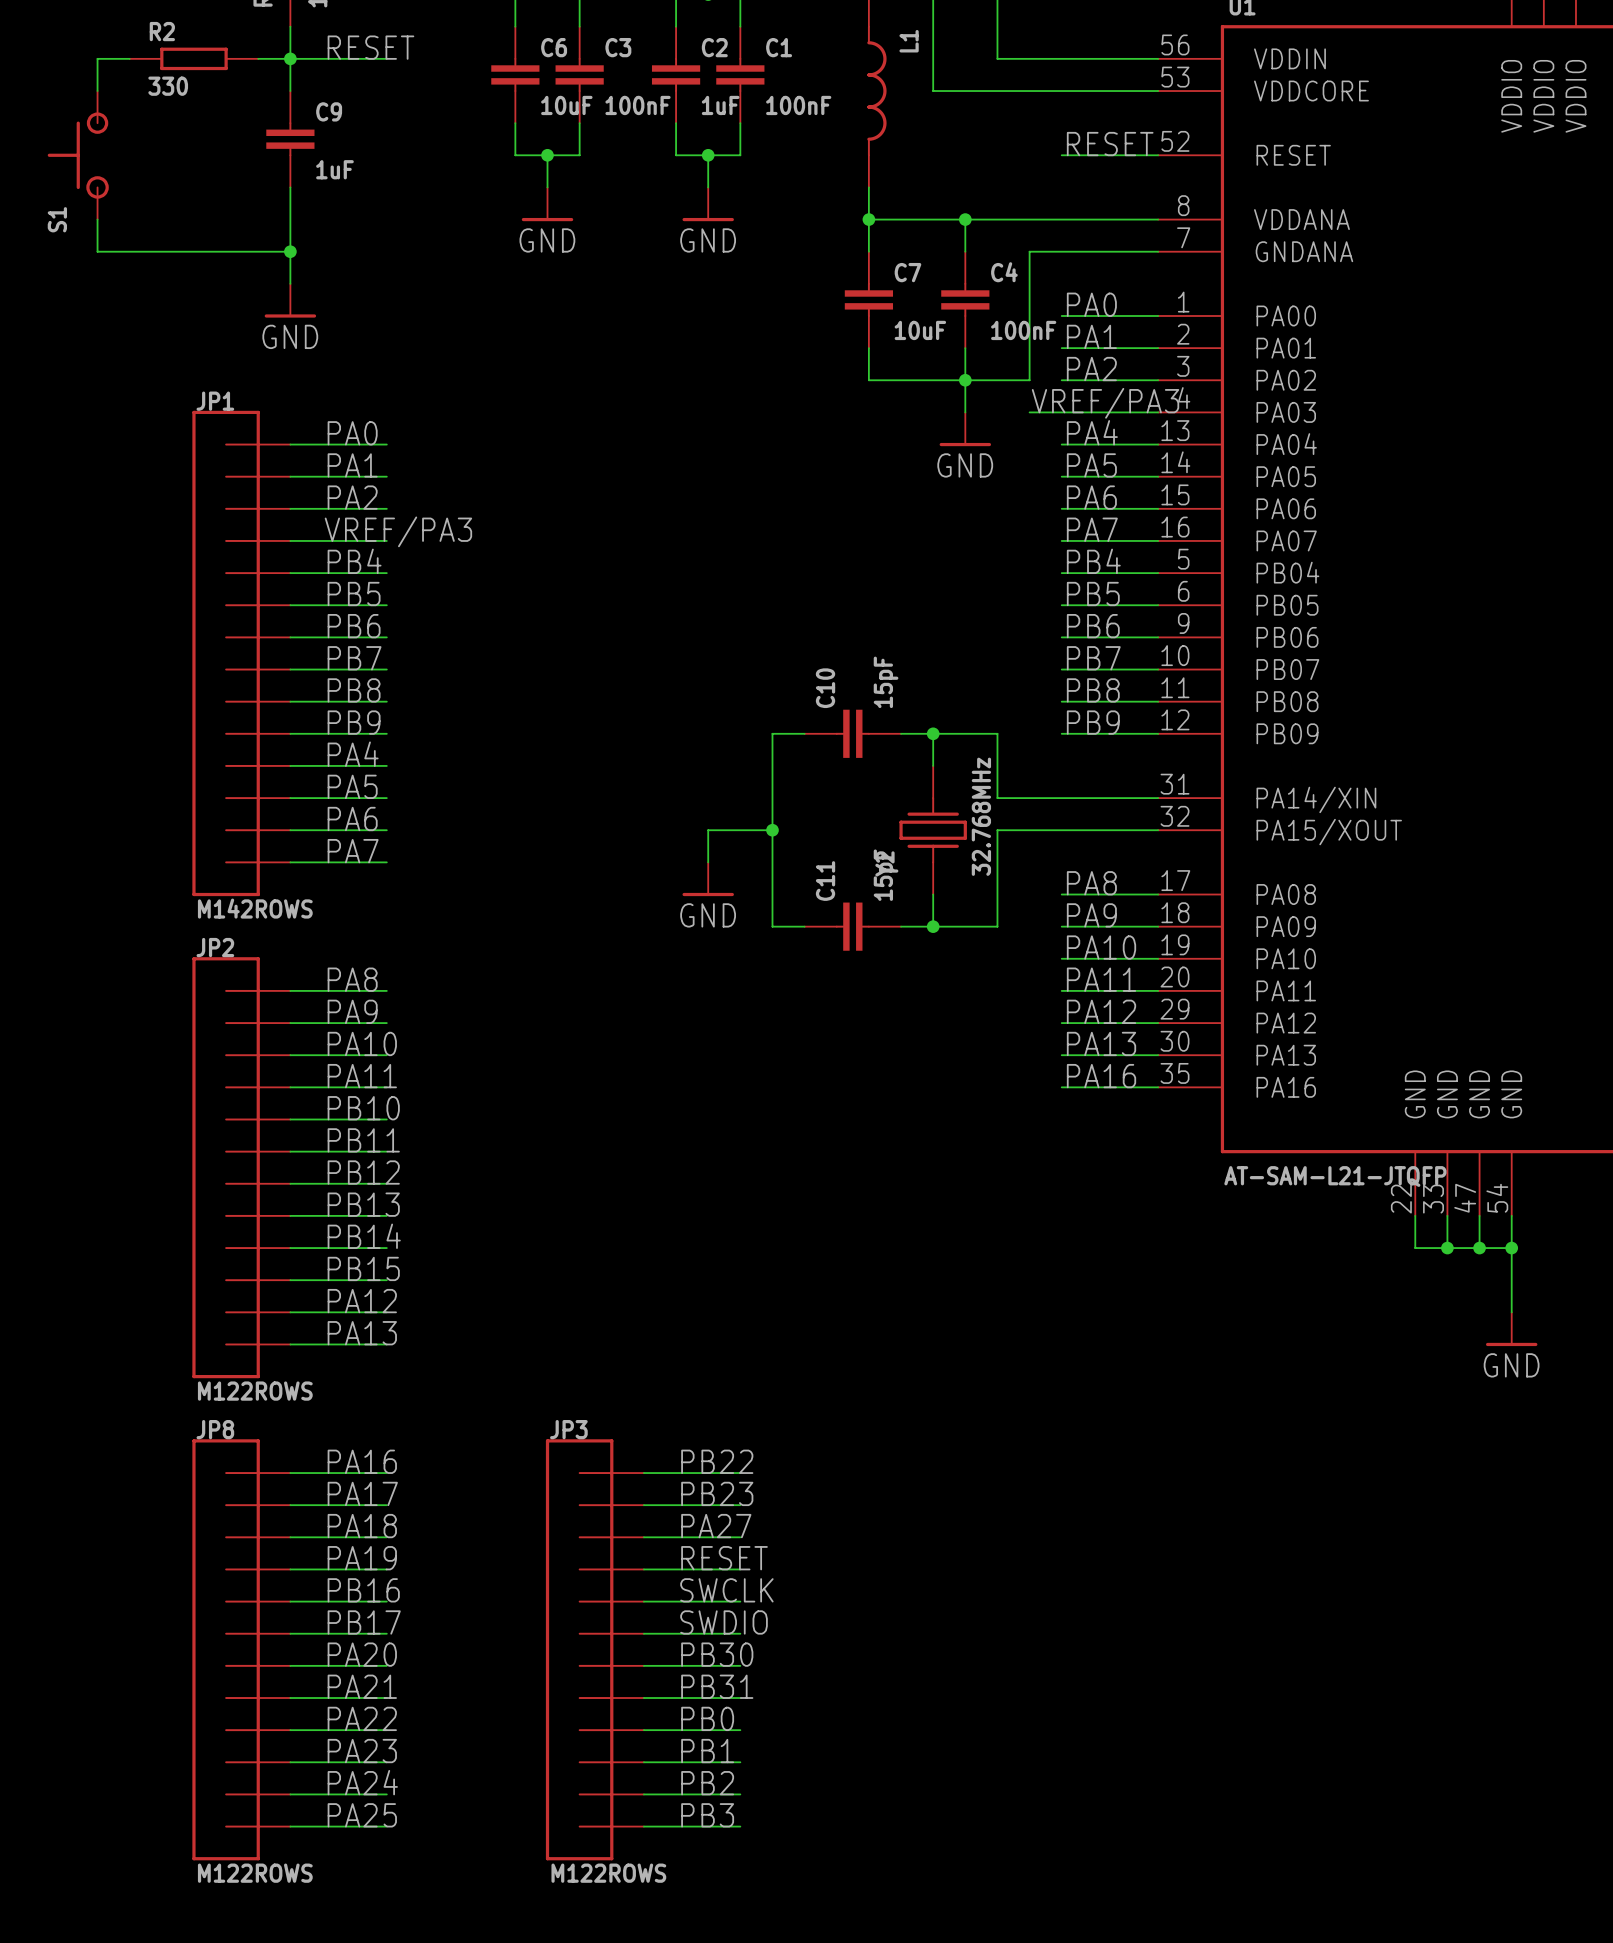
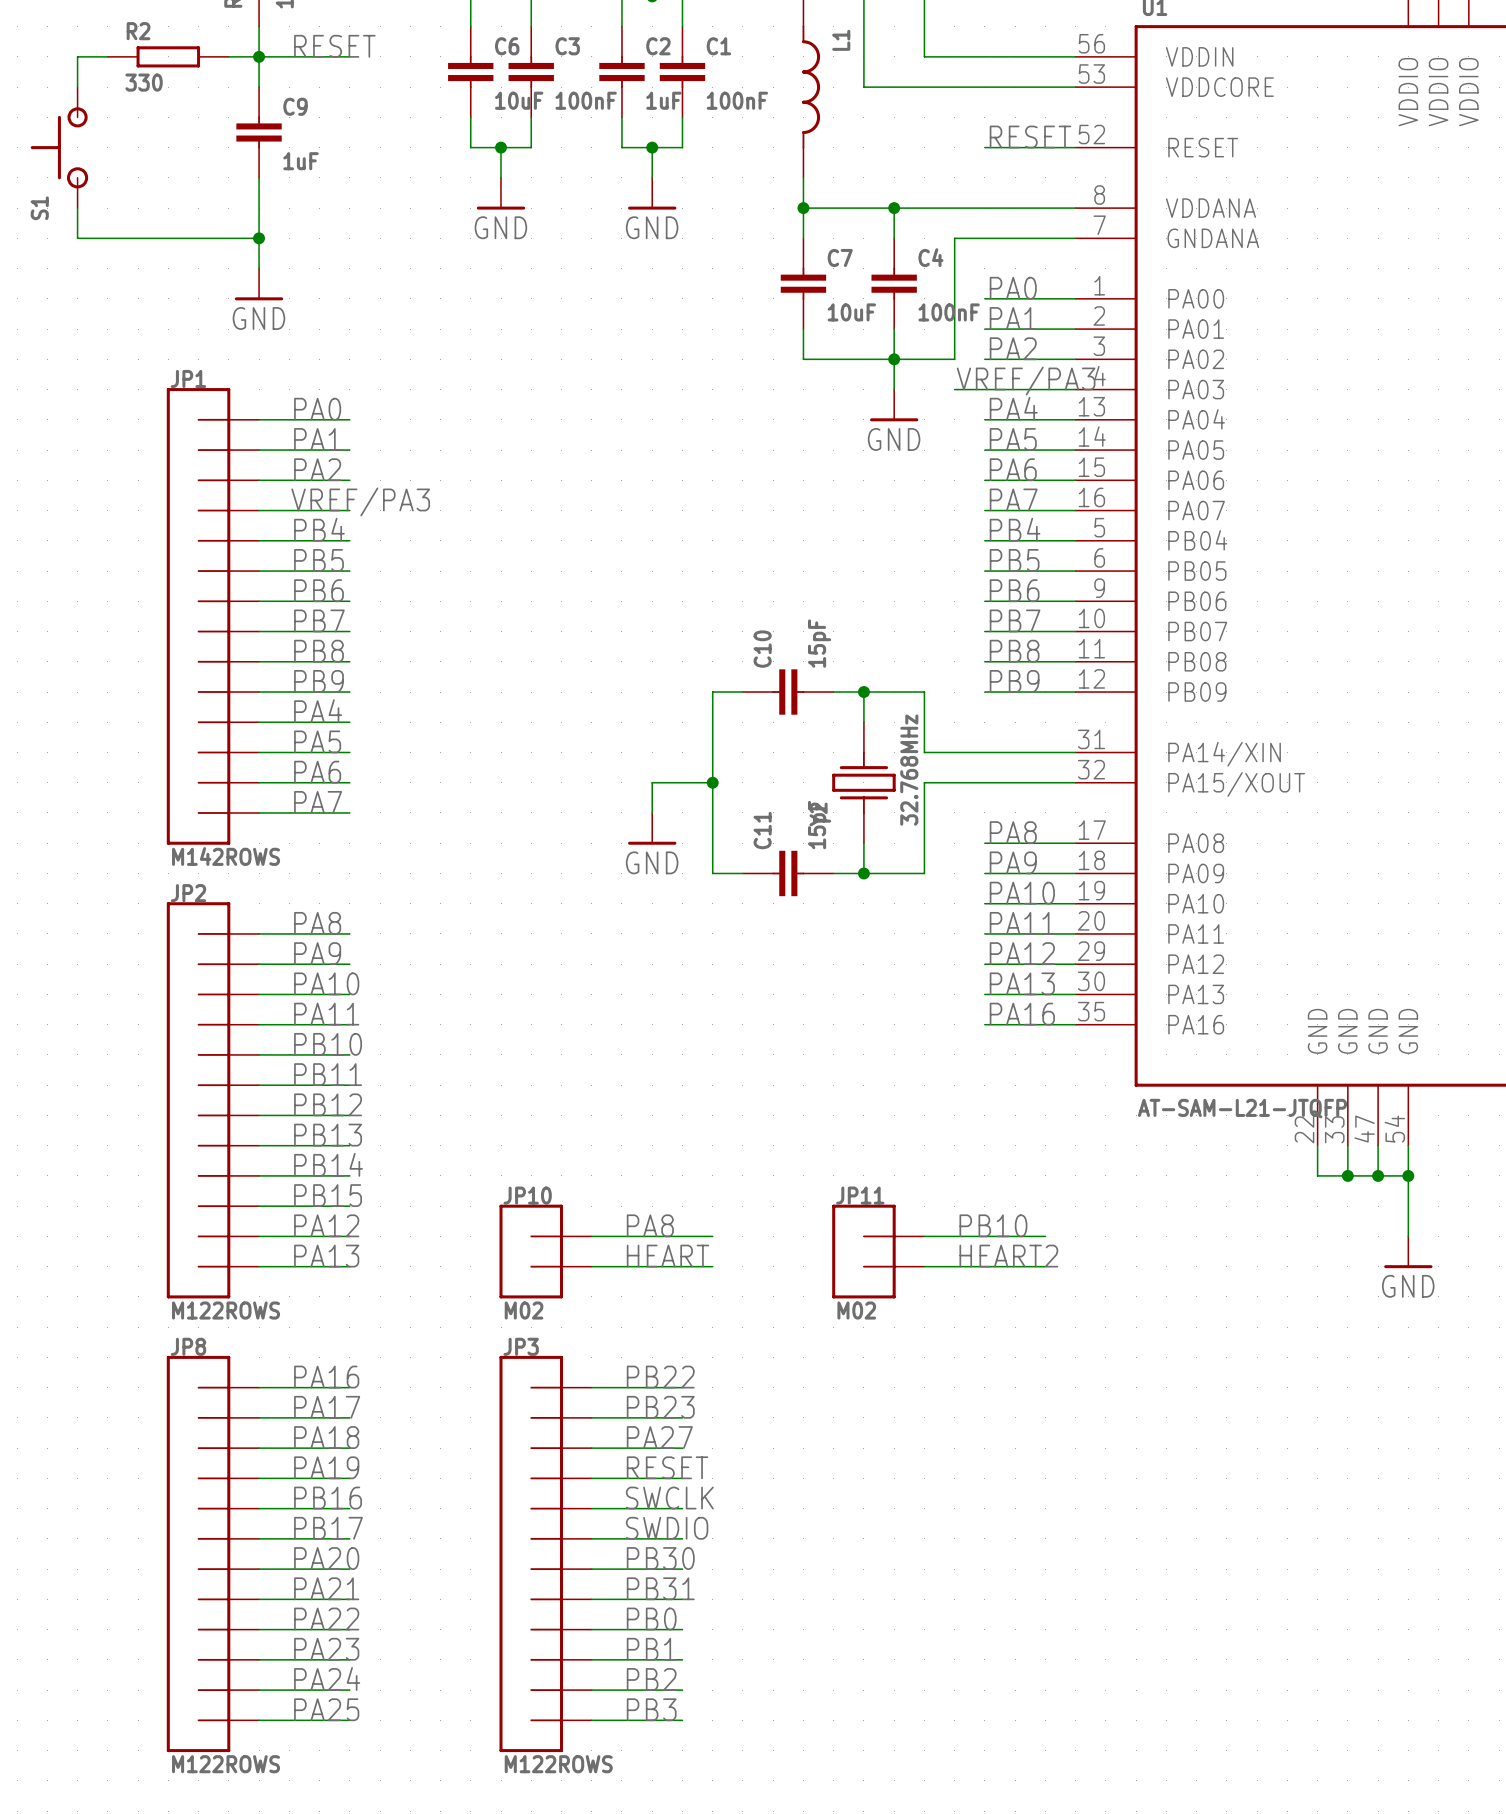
label: none -> PA8 (650, 1225)
label: none -> PB10 (993, 1225)
wire: none -> (591, 1236) (712, 1236)
wire: none -> (924, 1236) (1045, 1236)
JP10: none -> M02 (545, 1251)
JP11: none -> M02 (878, 1251)
label: none -> HEART (668, 1256)
label: none -> HEART2 (1008, 1256)
wire: none -> (591, 1266) (712, 1266)
wire: none -> (924, 1266) (1045, 1266)

